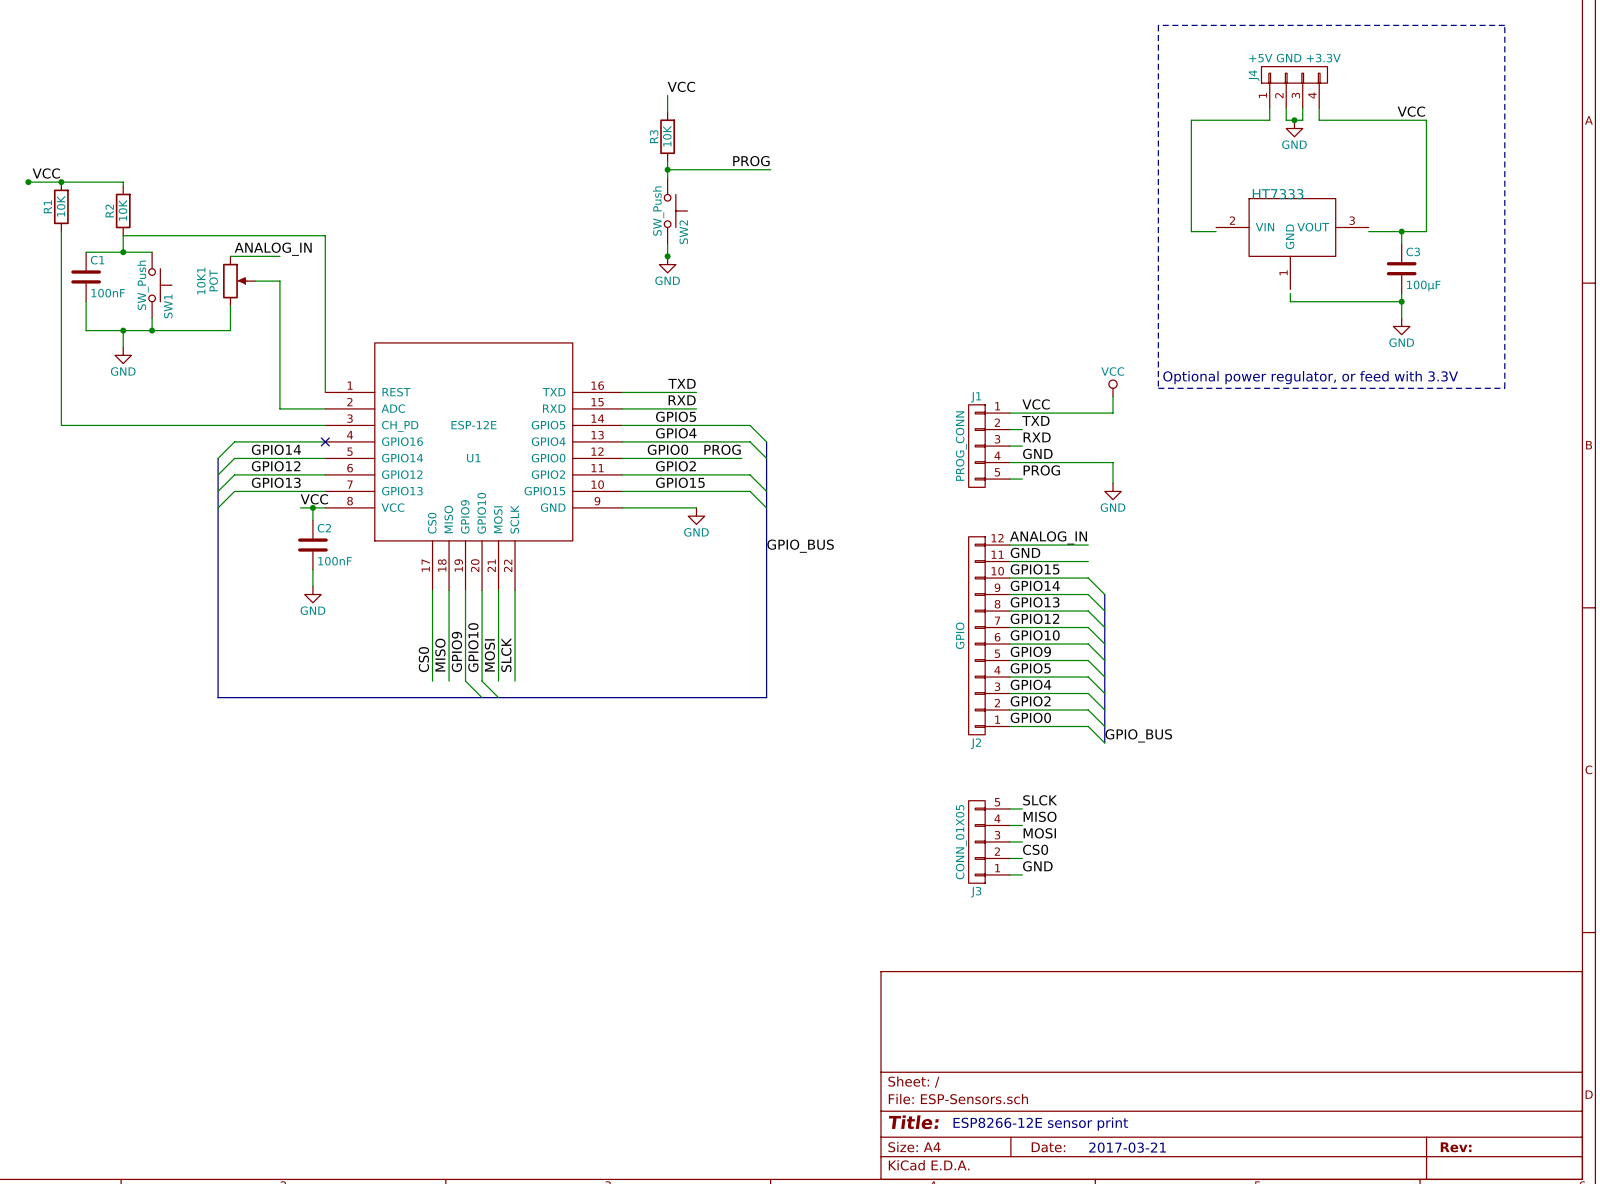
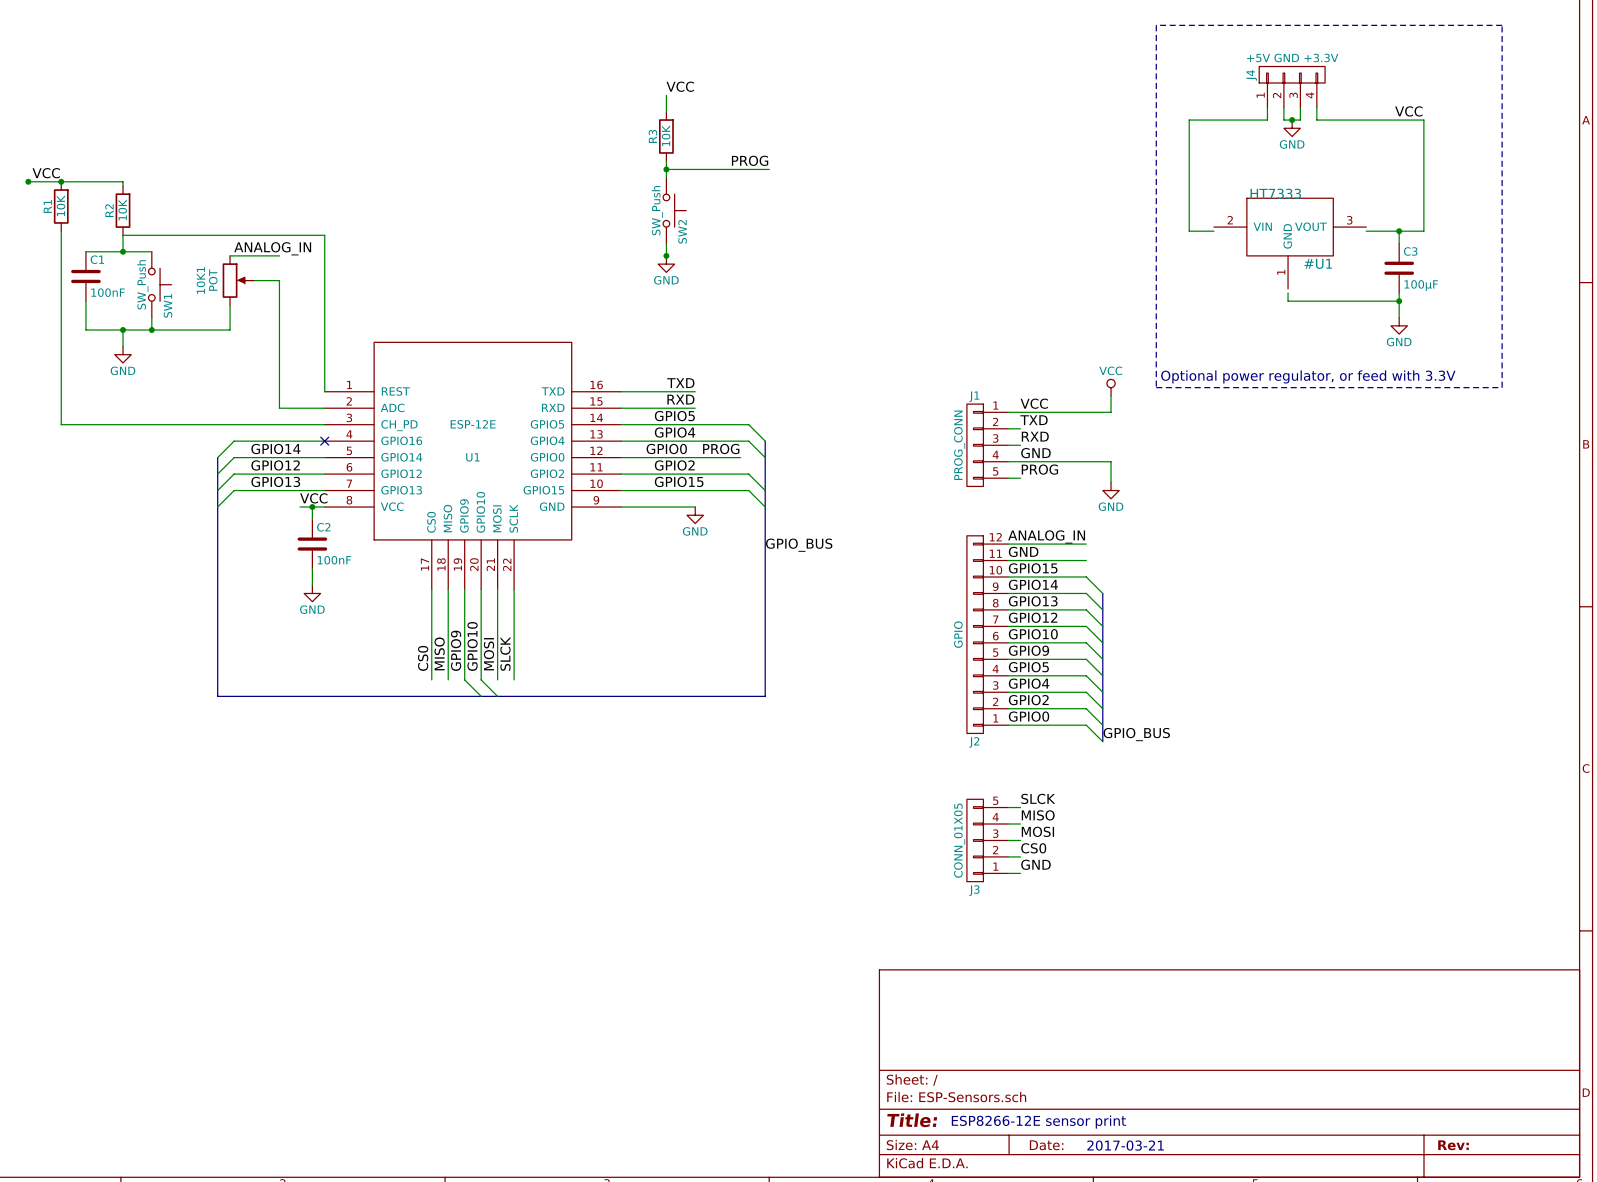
#U1 name: none -> #U1 (1318, 263)

